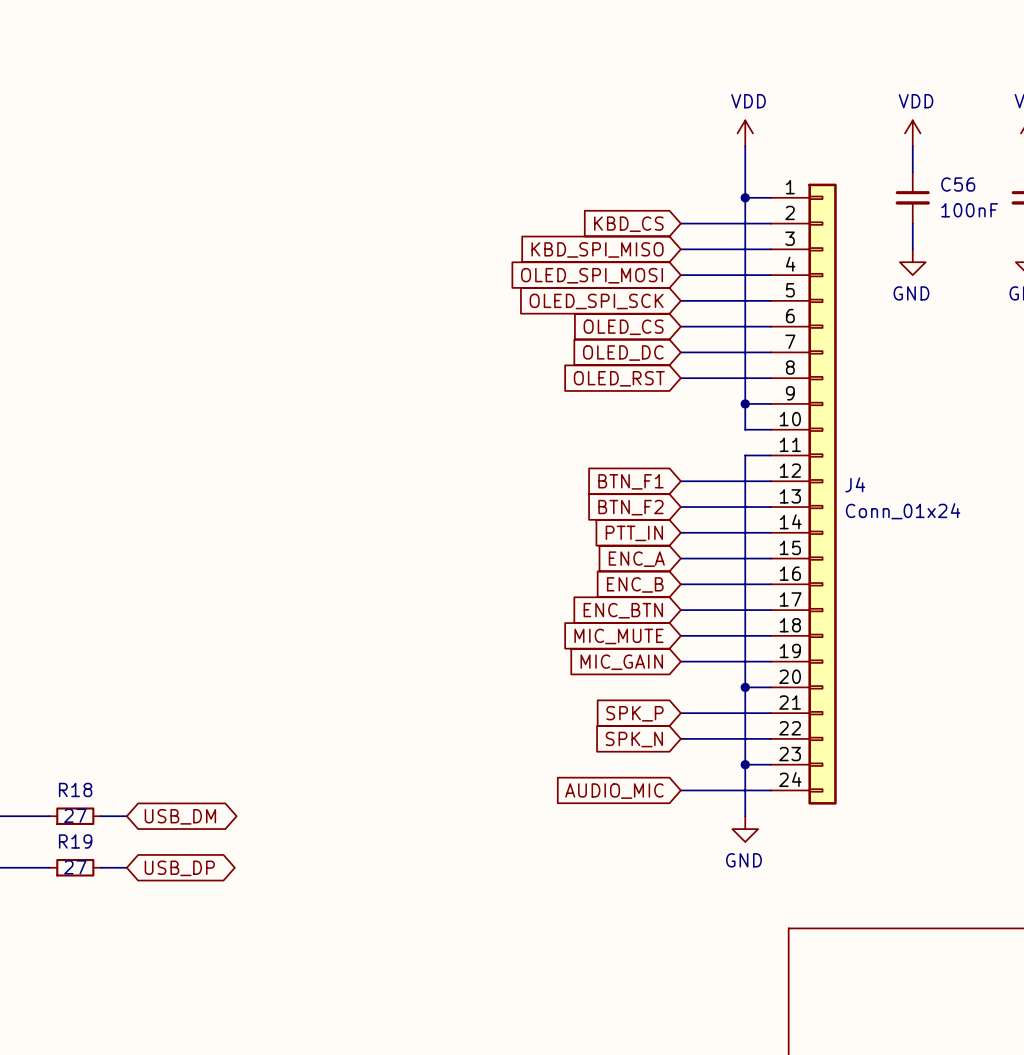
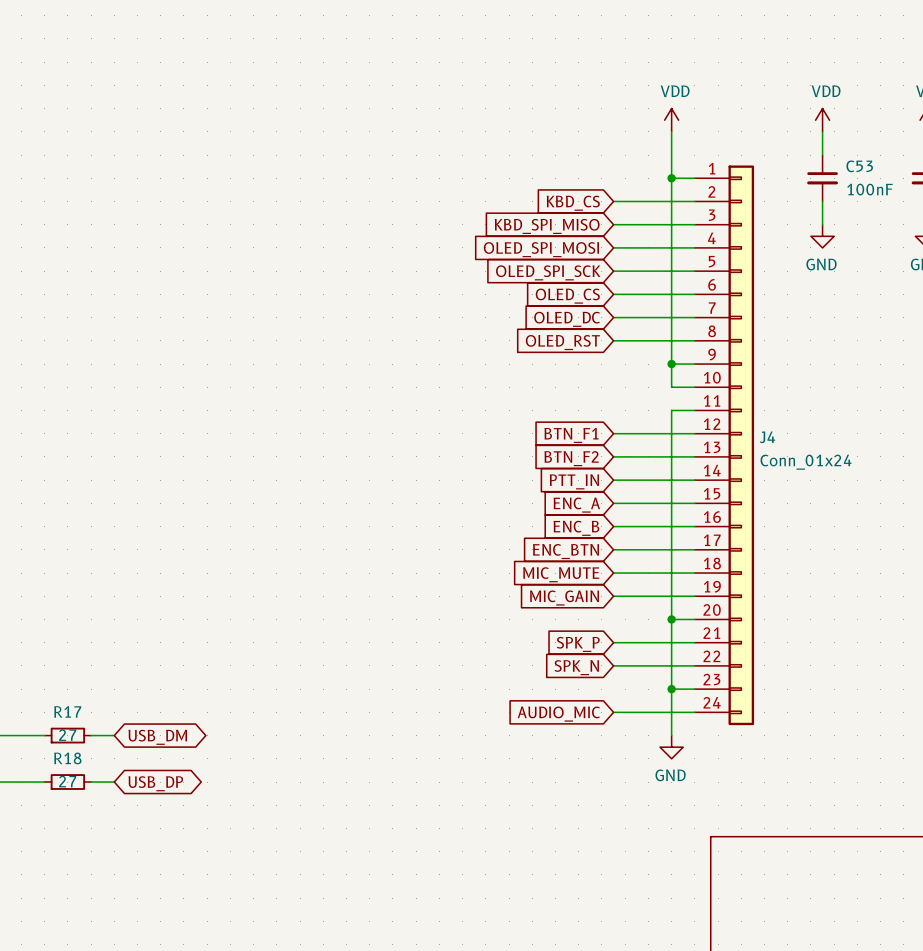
C56 name: C56 (958, 184) -> C53 (859, 166)
R18 name: R18 (75, 789) -> R17 (67, 711)
R19 name: R19 (75, 841) -> R18 (67, 758)

